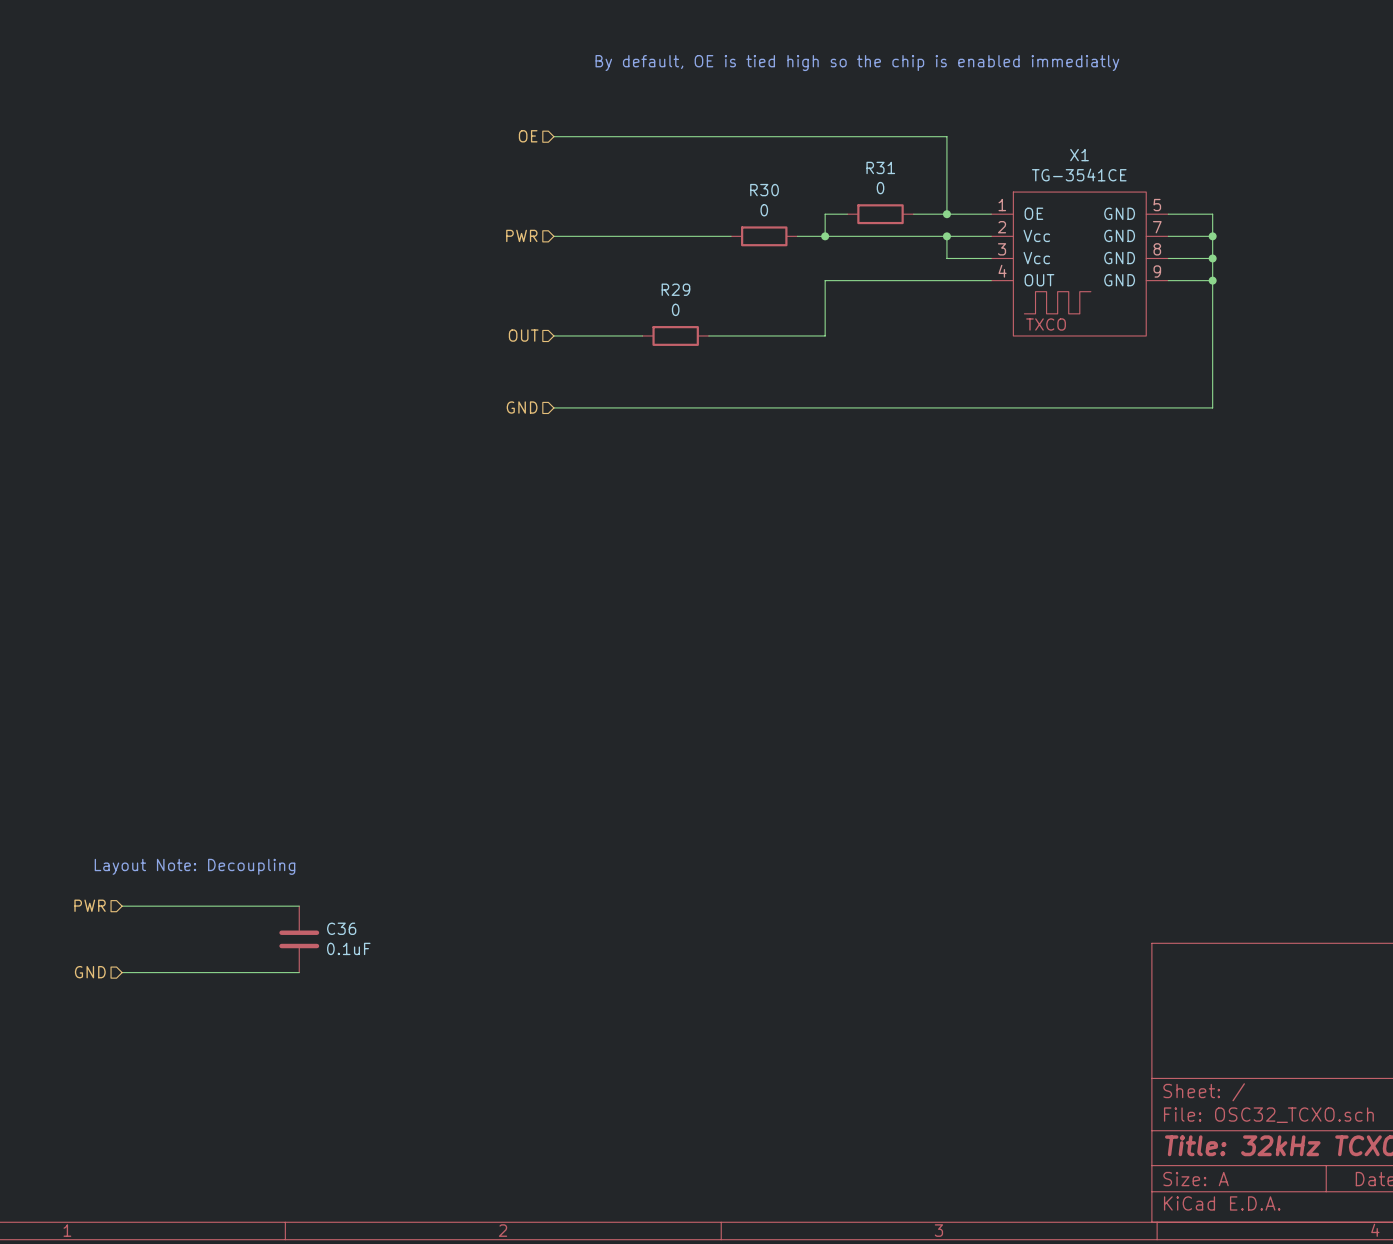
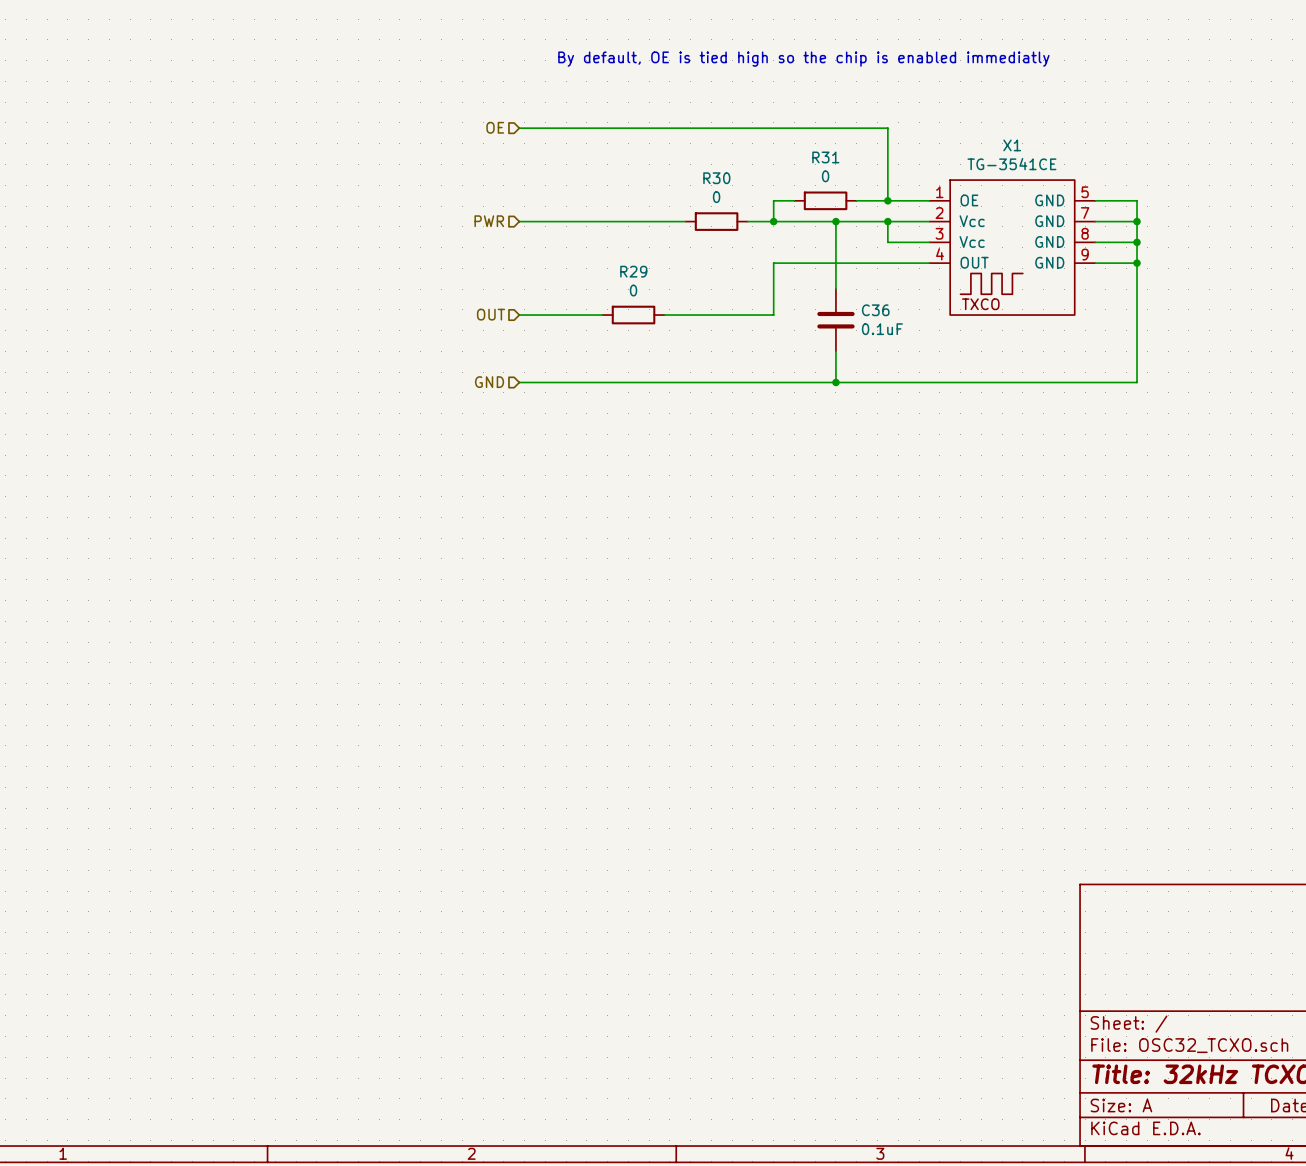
wire: none -> (835, 221) (835, 289)
junction: none -> (835, 221)
wire: none -> (835, 351) (835, 382)
junction: none -> (835, 382)
text: Layout Note: Decoupling (194, 866) -> none
hierarchical label: PWR (90, 905) -> none
wire: (122, 906) (299, 906) -> none
C36 position: (299, 939) -> (835, 320)
hierarchical label: GND (90, 972) -> none
wire: (122, 972) (299, 972) -> none

